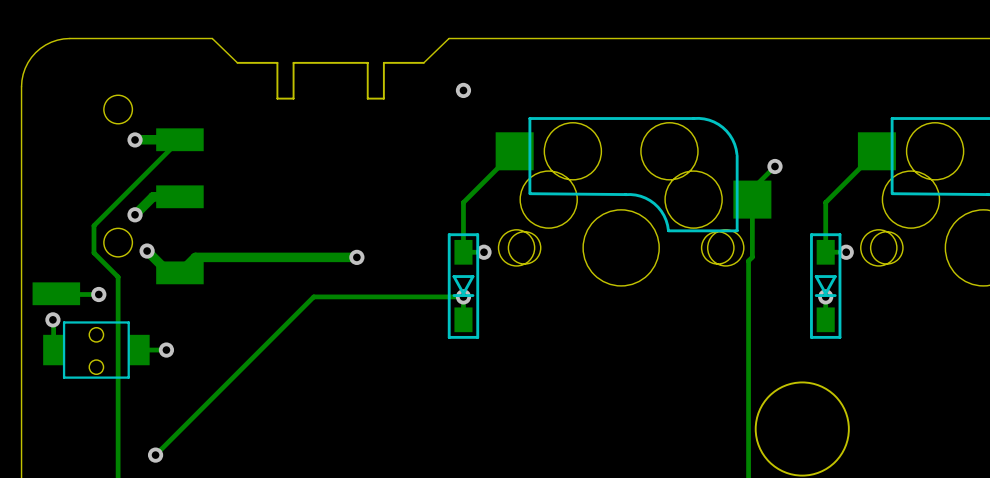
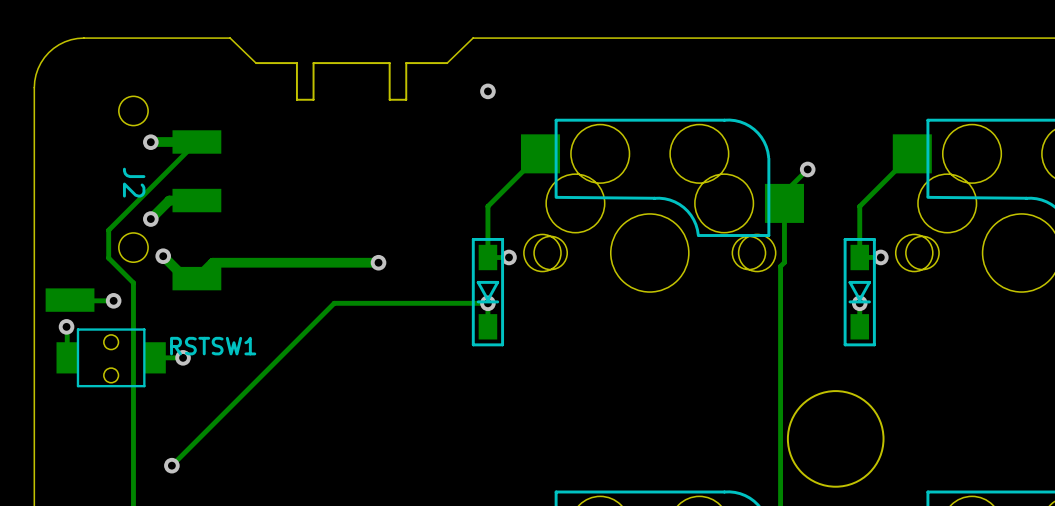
text: none -> J2 (134, 182)
text: none -> RSTSW1 (213, 346)

